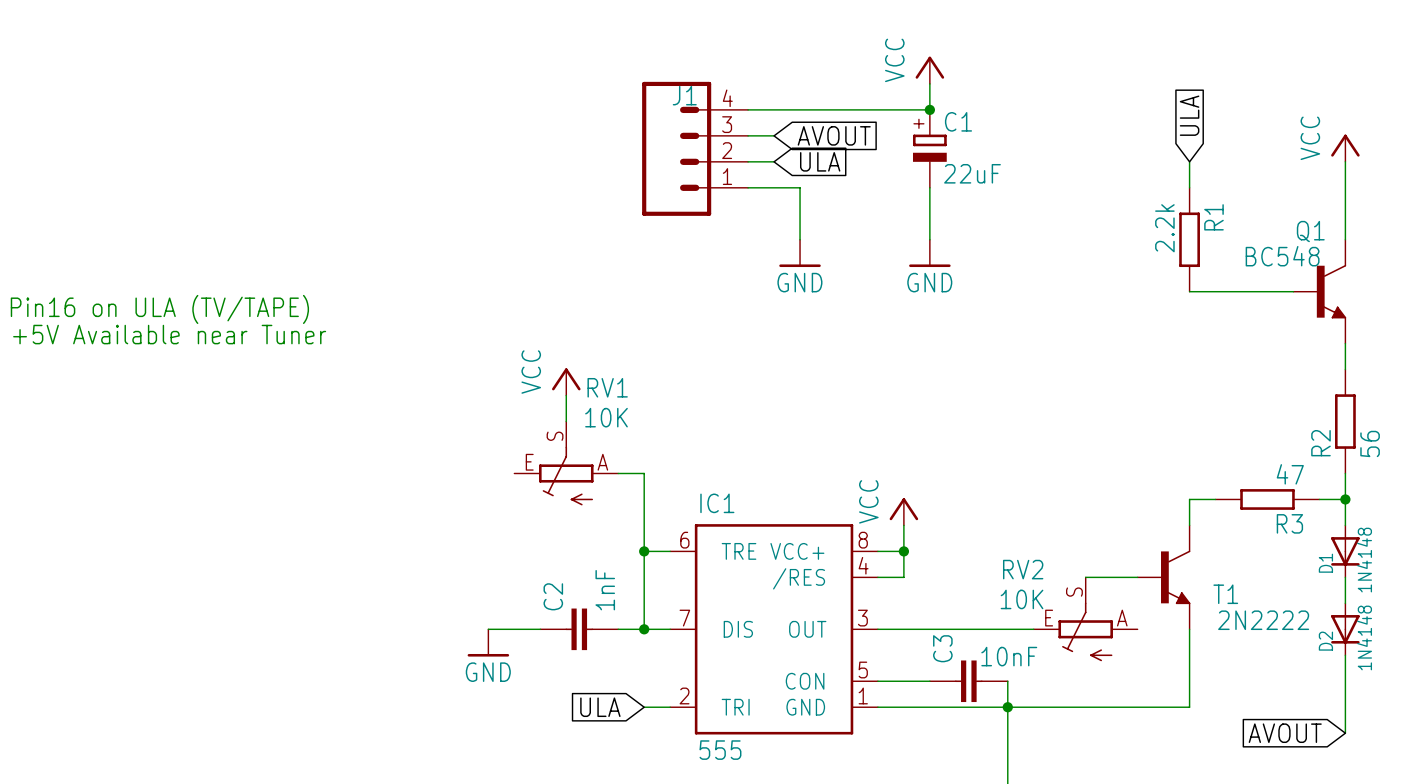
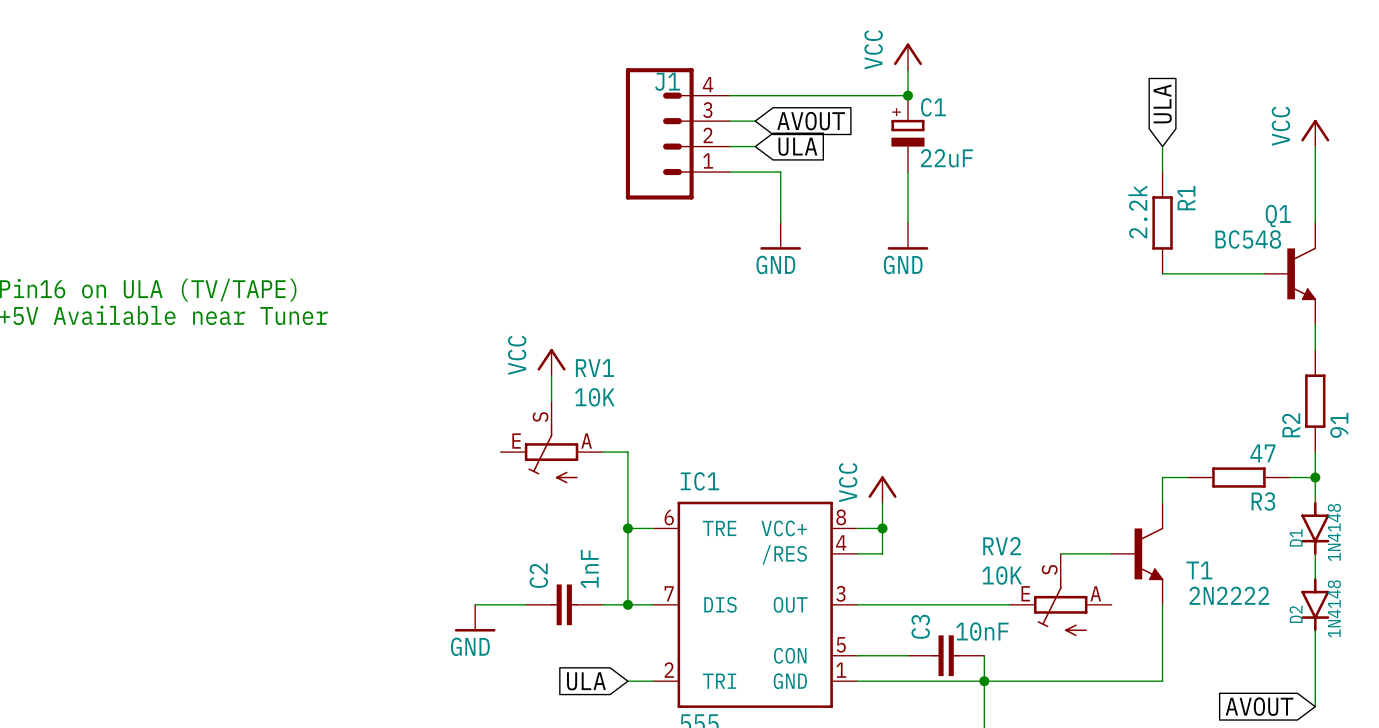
R2 value: 56 (1370, 443) -> 91 (1339, 425)
D1 symbol: [1331, 525, 1360, 578] -> [1301, 501, 1330, 556]
D2 symbol: [1331, 603, 1360, 656] -> [1301, 578, 1330, 632]

